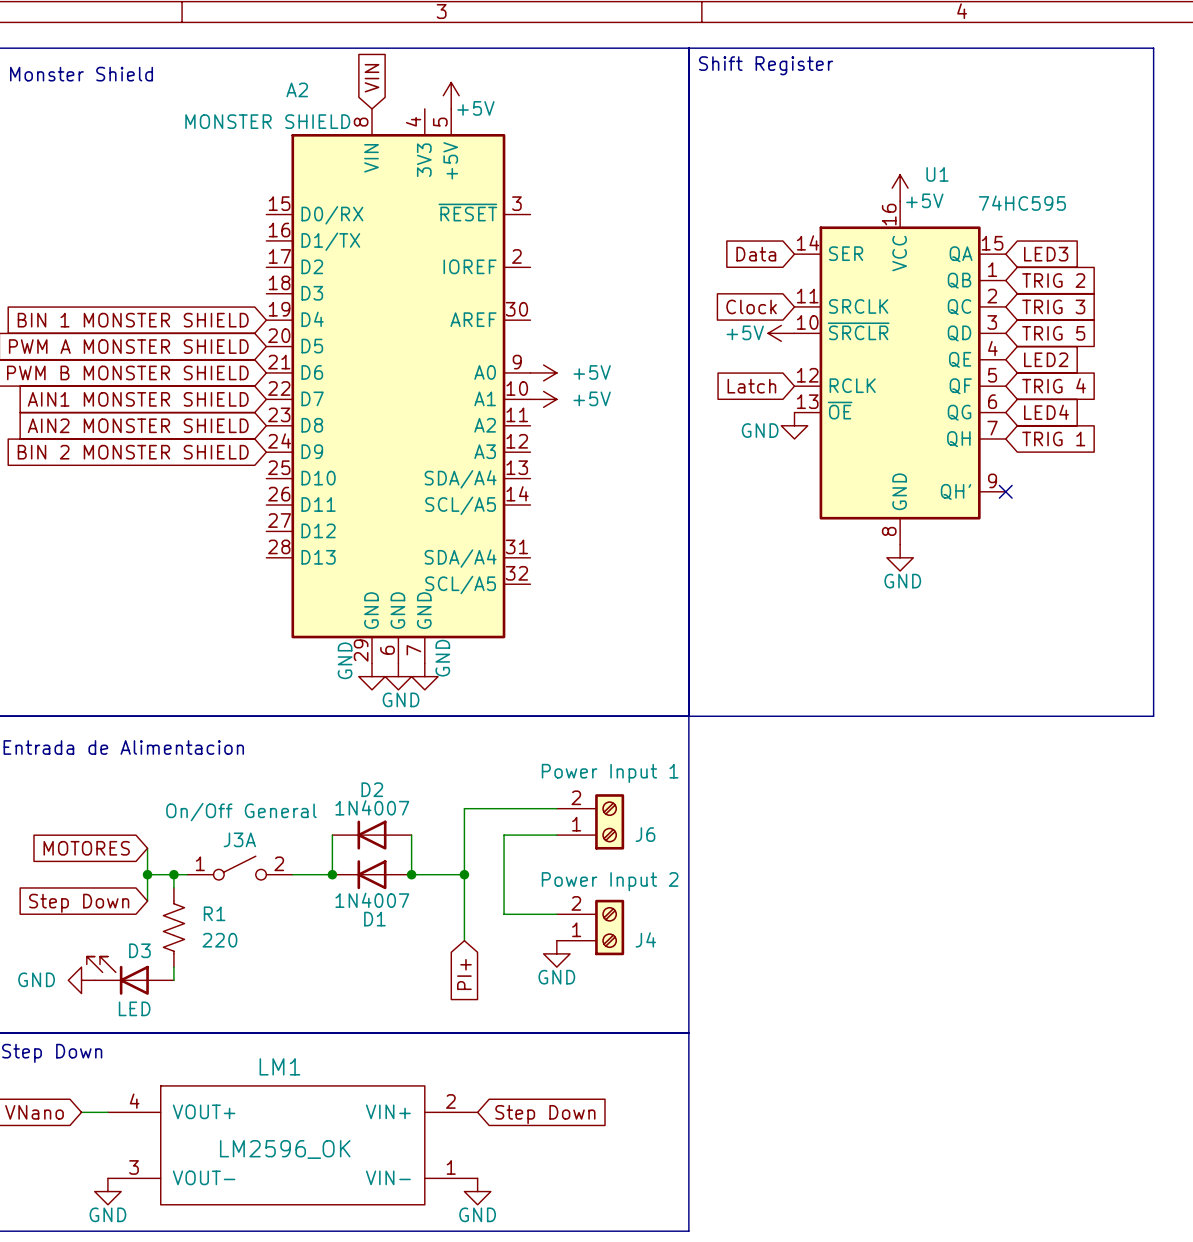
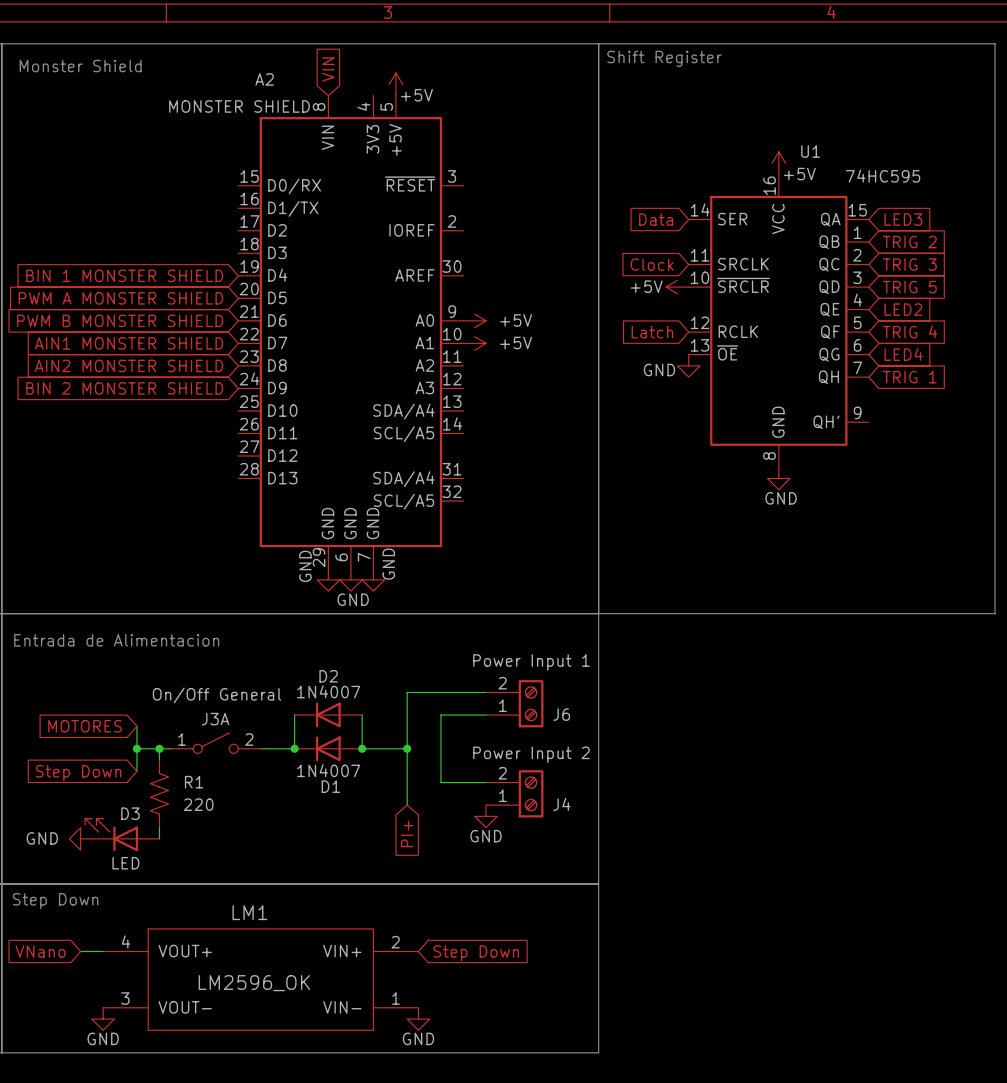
no-connect mark: (1005, 491) -> none

